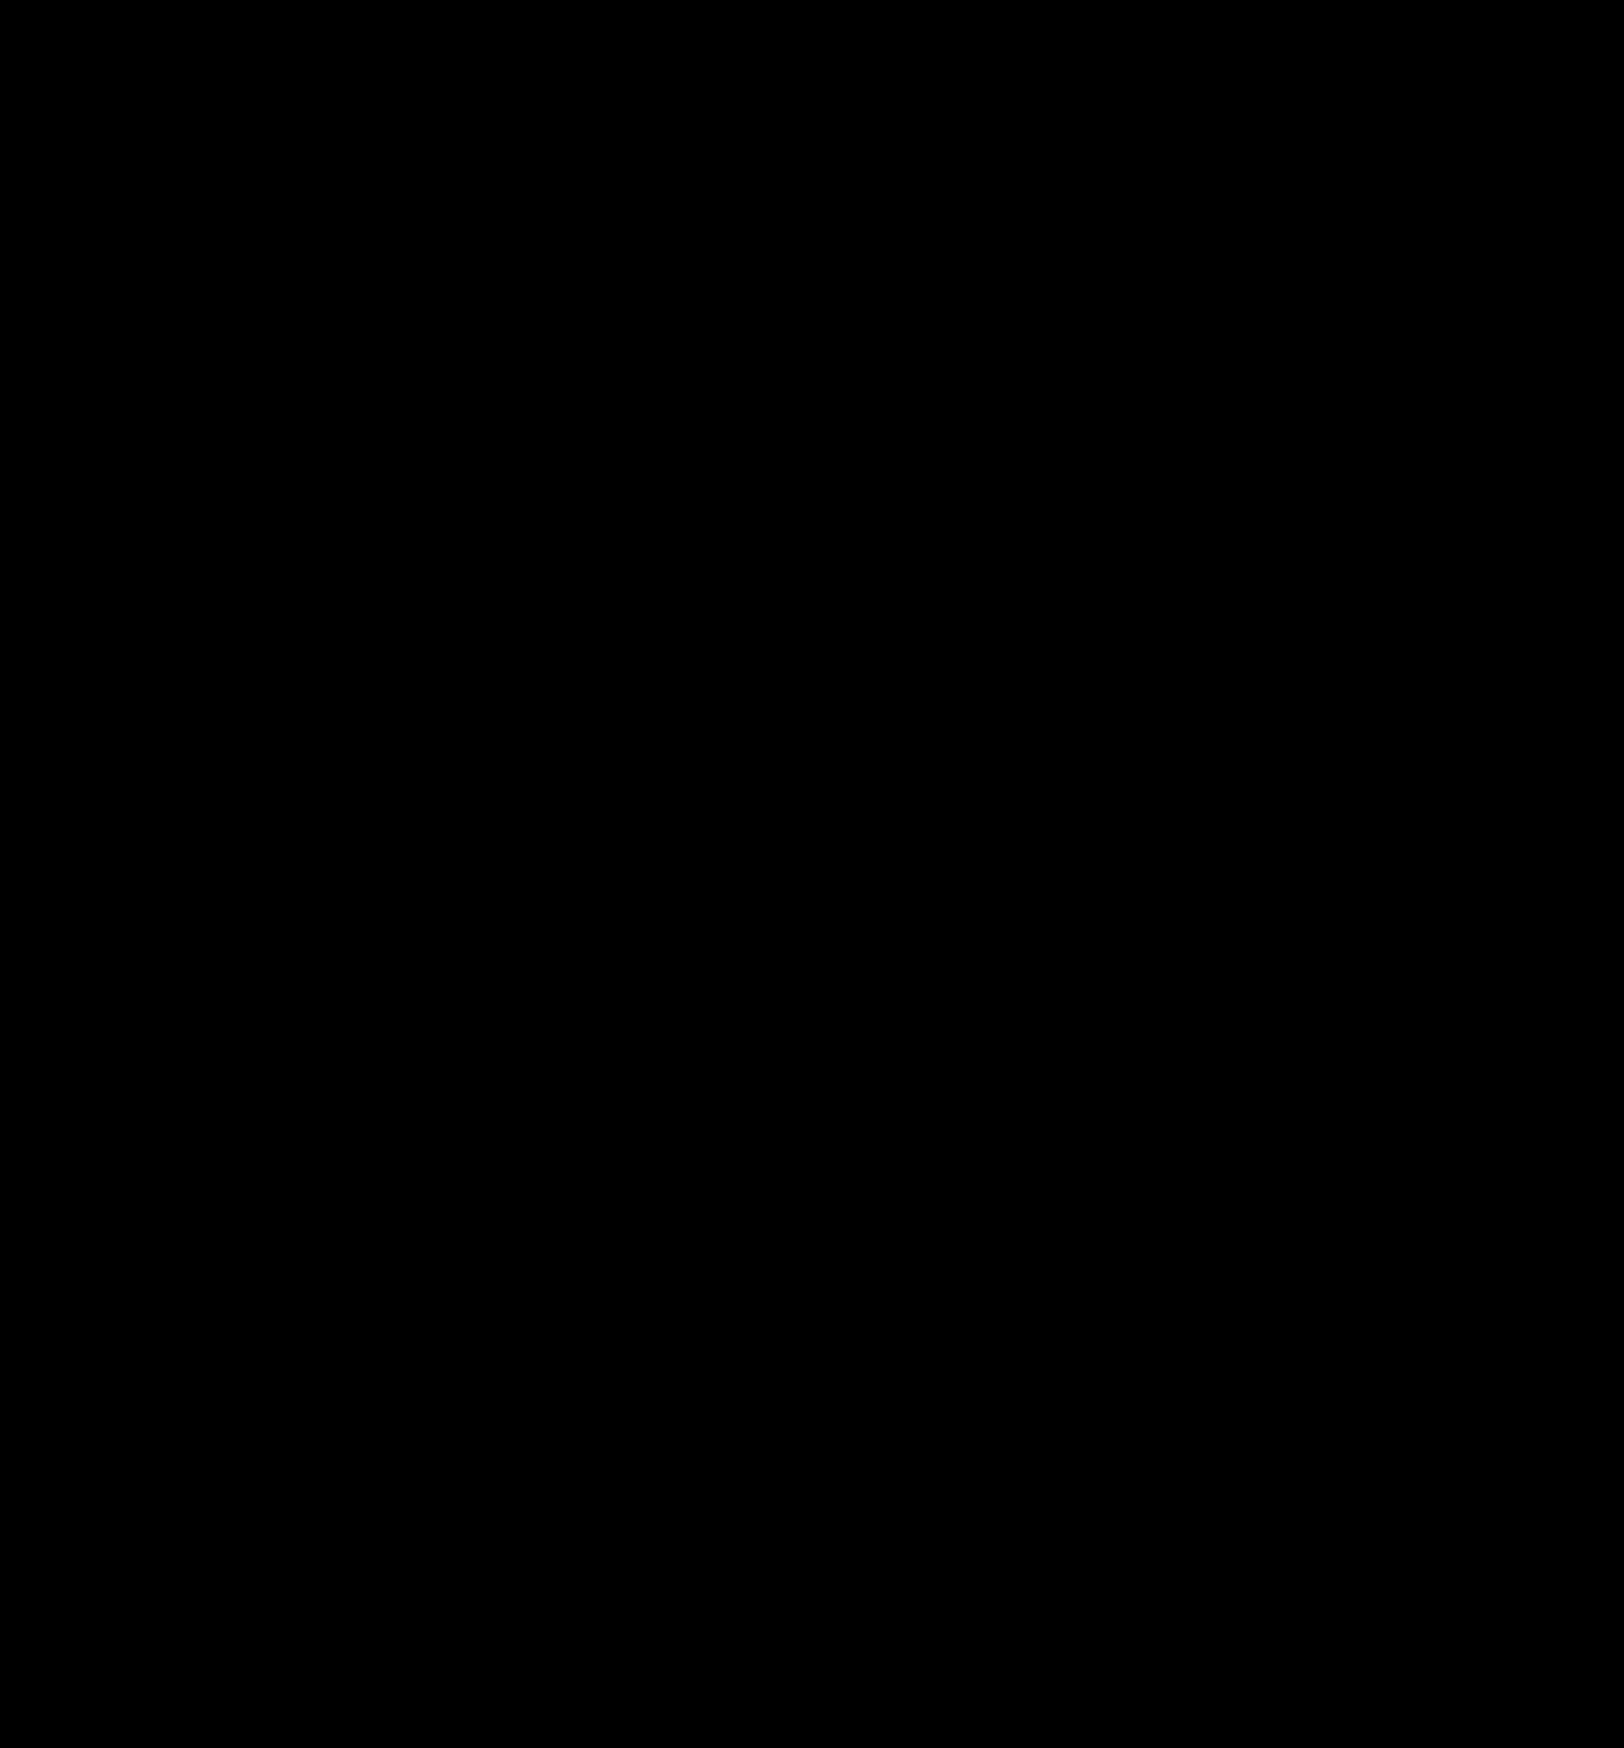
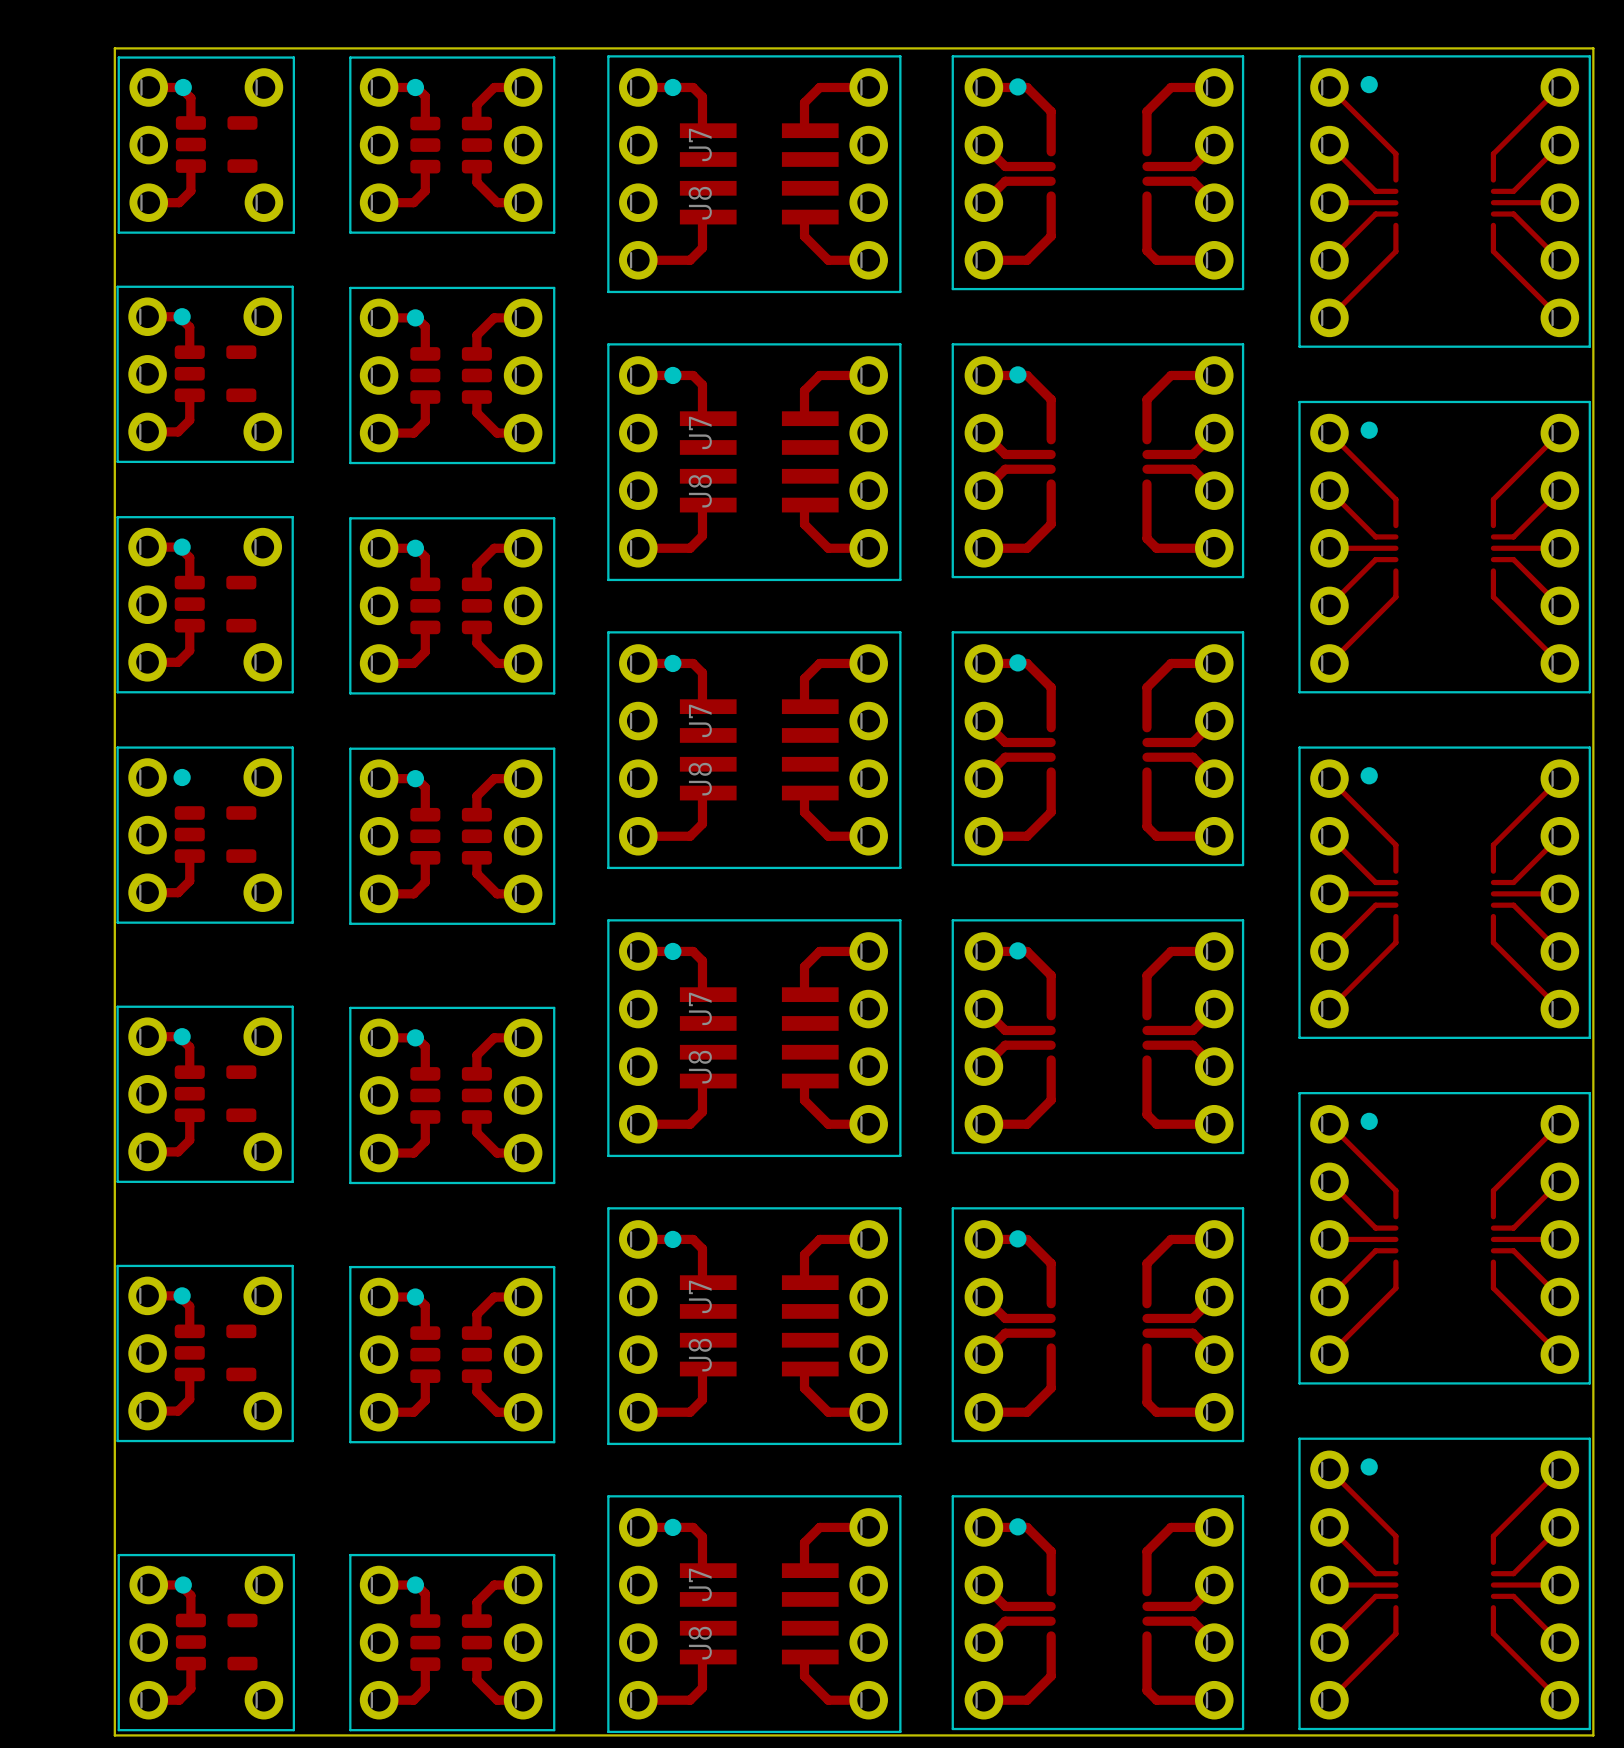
board edge: none -> (114, 48) (1593, 48) (1593, 1735) (114, 1735) (114, 48)
line: none -> (608, 56) (608, 291) (900, 291) (900, 56) (608, 56)
line: none -> (952, 56) (1243, 56) (1243, 289) (952, 289) (952, 56)
line: none -> (1299, 56) (1589, 56) (1589, 346) (1299, 346) (1299, 56)
line: none -> (118, 57) (118, 232) (293, 232) (293, 57) (118, 57)
line: none -> (350, 57) (350, 232) (554, 232) (554, 57) (350, 57)
drawing: none -> [1360, 76, 1378, 94]
drawing: none -> [174, 78, 192, 97]
drawing: none -> [406, 78, 425, 97]
drawing: none -> [664, 78, 682, 97]
drawing: none -> [1009, 78, 1027, 96]
top track: none -> (148, 87) (180, 87) (190, 97) (190, 122)
part: none -> (148, 87)
part: none -> (263, 87)
top track: none -> (379, 87) (416, 87) (425, 96) (425, 123)
part: none -> (379, 87)
top track: none -> (523, 87) (494, 87) (476, 104) (476, 123)
part: none -> (523, 87)
top track: none -> (638, 87) (693, 87) (702, 96) (702, 130)
part: none -> (638, 87)
top track: none -> (868, 87) (819, 87) (804, 102) (804, 130)
part: none -> (868, 87)
top track: none -> (983, 87) (1027, 87) (1051, 111) (1051, 151)
part: none -> (983, 87)
top track: none -> (1214, 87) (1171, 87) (1146, 111) (1146, 151)
part: none -> (1214, 87)
top track: none -> (1329, 87) (1395, 153) (1395, 180)
part: none -> (1329, 87)
top track: none -> (1559, 87) (1493, 153) (1493, 180)
part: none -> (1559, 87)
part: none -> (216, 144)
part: none -> (148, 145)
part: none -> (379, 145)
part: none -> (451, 145)
part: none -> (523, 145)
J7: none -> (638, 145)
part: none -> (868, 145)
top track: none -> (983, 145) (1005, 166) (1051, 166)
part: none -> (983, 145)
top track: none -> (1214, 145) (1192, 166) (1146, 166)
part: none -> (1214, 145)
top track: none -> (1329, 145) (1375, 191) (1395, 191)
part: none -> (1329, 145)
top track: none -> (1559, 145) (1513, 191) (1493, 191)
part: none -> (1559, 145)
top track: none -> (190, 166) (190, 191) (179, 202) (148, 202)
top track: none -> (425, 166) (425, 191) (413, 202) (379, 202)
top track: none -> (476, 166) (476, 182) (497, 202) (523, 202)
part: none -> (759, 173)
top track: none -> (1051, 181) (1005, 181) (983, 202)
top track: none -> (1146, 181) (1192, 181) (1214, 202)
top track: none -> (1051, 196) (1051, 236) (1027, 260) (983, 260)
top track: none -> (1146, 196) (1146, 250) (1156, 260) (1214, 260)
part: none -> (148, 202)
part: none -> (263, 202)
part: none -> (379, 202)
part: none -> (523, 202)
J8: none -> (638, 202)
part: none -> (868, 202)
part: none -> (983, 202)
part: none -> (1214, 202)
top track: none -> (1329, 202) (1395, 202)
part: none -> (1329, 202)
top track: none -> (1493, 202) (1559, 202)
part: none -> (1559, 202)
top track: none -> (1395, 214) (1375, 214) (1329, 260)
top track: none -> (1493, 214) (1513, 214) (1559, 260)
top track: none -> (702, 217) (702, 247) (690, 260) (638, 260)
top track: none -> (804, 217) (804, 236) (828, 260) (868, 260)
top track: none -> (1395, 225) (1395, 251) (1329, 317)
top track: none -> (1493, 225) (1493, 251) (1559, 317)
part: none -> (638, 260)
part: none -> (868, 260)
part: none -> (983, 260)
part: none -> (1214, 260)
part: none -> (1329, 260)
part: none -> (1559, 260)
line: none -> (117, 286) (117, 461) (292, 461) (292, 286) (117, 286)
line: none -> (350, 287) (350, 463) (554, 463) (554, 287) (350, 287)
drawing: none -> [173, 308, 191, 326]
drawing: none -> [406, 309, 425, 327]
top track: none -> (147, 316) (179, 316) (189, 327) (189, 352)
part: none -> (147, 316)
part: none -> (262, 316)
top track: none -> (379, 317) (416, 317) (425, 326) (425, 353)
part: none -> (379, 317)
top track: none -> (523, 317) (494, 317) (476, 335) (476, 353)
part: none -> (523, 317)
part: none -> (1329, 317)
part: none -> (1559, 317)
line: none -> (608, 344) (900, 344) (900, 579) (608, 579) (608, 344)
line: none -> (952, 344) (1243, 344) (1243, 577) (952, 577) (952, 344)
drawing: none -> [664, 366, 682, 385]
drawing: none -> [1009, 366, 1027, 384]
part: none -> (215, 373)
part: none -> (147, 374)
part: none -> (379, 375)
part: none -> (451, 375)
part: none -> (523, 375)
top track: none -> (638, 375) (693, 375) (702, 384) (702, 418)
part: none -> (638, 375)
top track: none -> (868, 375) (819, 375) (804, 390) (804, 418)
part: none -> (868, 375)
top track: none -> (983, 375) (1027, 375) (1051, 399) (1051, 439)
part: none -> (983, 375)
top track: none -> (1214, 375) (1171, 375) (1146, 399) (1146, 439)
part: none -> (1214, 375)
top track: none -> (189, 395) (189, 420) (178, 431) (147, 431)
top track: none -> (425, 397) (425, 421) (413, 433) (379, 433)
top track: none -> (476, 397) (476, 412) (497, 433) (523, 433)
line: none -> (1299, 401) (1299, 692) (1589, 692) (1589, 401) (1299, 401)
drawing: none -> [1360, 421, 1378, 439]
part: none -> (147, 431)
part: none -> (262, 431)
part: none -> (379, 433)
part: none -> (523, 433)
J7: none -> (638, 433)
part: none -> (868, 433)
top track: none -> (983, 433) (1005, 454) (1051, 454)
part: none -> (983, 433)
top track: none -> (1214, 433) (1192, 454) (1146, 454)
part: none -> (1214, 433)
top track: none -> (1329, 433) (1395, 499) (1395, 525)
part: none -> (1329, 433)
top track: none -> (1559, 433) (1493, 499) (1493, 525)
part: none -> (1559, 433)
part: none -> (759, 461)
top track: none -> (1051, 469) (1005, 469) (983, 490)
top track: none -> (1146, 469) (1192, 469) (1214, 490)
top track: none -> (1051, 483) (1051, 524) (1027, 548) (983, 548)
top track: none -> (1146, 483) (1146, 538) (1156, 548) (1214, 548)
J8: none -> (638, 490)
part: none -> (868, 490)
part: none -> (983, 490)
part: none -> (1214, 490)
top track: none -> (1329, 490) (1375, 536) (1395, 536)
part: none -> (1329, 490)
top track: none -> (1559, 490) (1513, 536) (1493, 536)
part: none -> (1559, 490)
top track: none -> (702, 505) (702, 535) (690, 548) (638, 548)
top track: none -> (804, 505) (804, 524) (828, 548) (868, 548)
line: none -> (117, 517) (117, 692) (292, 692) (292, 517) (117, 517)
line: none -> (350, 518) (350, 693) (554, 693) (554, 518) (350, 518)
drawing: none -> [173, 538, 191, 556]
drawing: none -> [406, 539, 425, 557]
top track: none -> (147, 547) (179, 547) (189, 557) (189, 582)
part: none -> (147, 547)
part: none -> (262, 547)
top track: none -> (379, 548) (416, 548) (425, 557) (425, 584)
part: none -> (379, 548)
top track: none -> (523, 548) (494, 548) (476, 565) (476, 584)
part: none -> (523, 548)
part: none -> (638, 548)
part: none -> (868, 548)
part: none -> (983, 548)
part: none -> (1214, 548)
top track: none -> (1329, 548) (1395, 548)
part: none -> (1329, 548)
top track: none -> (1493, 548) (1559, 548)
part: none -> (1559, 548)
top track: none -> (1395, 559) (1375, 559) (1329, 605)
top track: none -> (1493, 559) (1513, 559) (1559, 605)
top track: none -> (1395, 570) (1395, 597) (1329, 663)
top track: none -> (1493, 570) (1493, 597) (1559, 663)
part: none -> (147, 604)
part: none -> (215, 604)
part: none -> (379, 605)
part: none -> (451, 605)
part: none -> (523, 605)
part: none -> (1329, 605)
part: none -> (1559, 605)
top track: none -> (189, 625) (189, 650) (178, 662) (147, 662)
top track: none -> (425, 627) (425, 651) (413, 663) (379, 663)
top track: none -> (476, 627) (476, 643) (497, 663) (523, 663)
line: none -> (608, 632) (608, 867) (900, 867) (900, 632) (608, 632)
line: none -> (952, 632) (952, 865) (1243, 865) (1243, 632) (952, 632)
drawing: none -> [664, 654, 682, 673]
drawing: none -> [1009, 654, 1027, 672]
part: none -> (147, 662)
part: none -> (262, 662)
part: none -> (379, 663)
part: none -> (523, 663)
top track: none -> (638, 663) (693, 663) (702, 672) (702, 706)
part: none -> (638, 663)
top track: none -> (868, 663) (819, 663) (804, 678) (804, 706)
part: none -> (868, 663)
top track: none -> (983, 663) (1027, 663) (1051, 687) (1051, 727)
part: none -> (983, 663)
top track: none -> (1214, 663) (1171, 663) (1146, 687) (1146, 727)
part: none -> (1214, 663)
part: none -> (1329, 663)
part: none -> (1559, 663)
J7: none -> (638, 721)
part: none -> (868, 721)
top track: none -> (983, 721) (1005, 742) (1051, 742)
part: none -> (983, 721)
top track: none -> (1214, 721) (1192, 742) (1146, 742)
part: none -> (1214, 721)
line: none -> (117, 747) (292, 747) (292, 922) (117, 922) (117, 747)
line: none -> (1299, 747) (1589, 747) (1589, 1037) (1299, 1037) (1299, 747)
line: none -> (350, 748) (554, 748) (554, 923) (350, 923) (350, 748)
part: none -> (759, 749)
top track: none -> (1051, 757) (1005, 757) (983, 778)
top track: none -> (1146, 757) (1192, 757) (1214, 778)
drawing: none -> [1360, 767, 1378, 785]
drawing: none -> [173, 768, 191, 787]
drawing: none -> [406, 770, 425, 788]
top track: none -> (1051, 771) (1051, 812) (1027, 836) (983, 836)
top track: none -> (1146, 771) (1146, 826) (1156, 836) (1214, 836)
part: none -> (147, 777)
part: none -> (262, 777)
top track: none -> (379, 778) (416, 778) (425, 787) (425, 814)
part: none -> (379, 778)
top track: none -> (523, 778) (494, 778) (476, 796) (476, 814)
part: none -> (523, 778)
J8: none -> (638, 778)
part: none -> (868, 778)
part: none -> (983, 778)
part: none -> (1214, 778)
top track: none -> (1329, 778) (1395, 845) (1395, 871)
part: none -> (1329, 778)
top track: none -> (1559, 778) (1493, 845) (1493, 871)
part: none -> (1559, 778)
top track: none -> (702, 793) (702, 823) (690, 836) (638, 836)
top track: none -> (804, 793) (804, 812) (828, 836) (868, 836)
part: none -> (215, 834)
part: none -> (147, 835)
part: none -> (379, 836)
part: none -> (451, 836)
part: none -> (523, 836)
part: none -> (638, 836)
part: none -> (868, 836)
part: none -> (983, 836)
part: none -> (1214, 836)
top track: none -> (1329, 836) (1375, 882) (1395, 882)
part: none -> (1329, 836)
top track: none -> (1559, 836) (1513, 882) (1493, 882)
part: none -> (1559, 836)
top track: none -> (189, 856) (189, 881) (178, 892) (147, 892)
top track: none -> (425, 857) (425, 882) (413, 893) (379, 893)
top track: none -> (476, 857) (476, 873) (497, 893) (523, 893)
part: none -> (147, 892)
part: none -> (262, 892)
part: none -> (379, 893)
part: none -> (523, 893)
top track: none -> (1329, 893) (1395, 893)
part: none -> (1329, 893)
top track: none -> (1493, 893) (1559, 893)
part: none -> (1559, 893)
top track: none -> (1395, 905) (1375, 905) (1329, 951)
top track: none -> (1493, 905) (1513, 905) (1559, 951)
top track: none -> (1395, 916) (1395, 942) (1329, 1009)
top track: none -> (1493, 916) (1493, 942) (1559, 1009)
line: none -> (608, 920) (608, 1155) (900, 1155) (900, 920) (608, 920)
line: none -> (952, 920) (952, 1153) (1243, 1153) (1243, 920) (952, 920)
drawing: none -> [664, 942, 682, 961]
drawing: none -> [1009, 942, 1027, 960]
top track: none -> (638, 951) (693, 951) (702, 960) (702, 994)
part: none -> (638, 951)
top track: none -> (868, 951) (819, 951) (804, 966) (804, 994)
part: none -> (868, 951)
top track: none -> (983, 951) (1027, 951) (1051, 975) (1051, 1015)
part: none -> (983, 951)
top track: none -> (1214, 951) (1171, 951) (1146, 975) (1146, 1015)
part: none -> (1214, 951)
part: none -> (1329, 951)
part: none -> (1559, 951)
line: none -> (117, 1006) (117, 1181) (292, 1181) (292, 1006) (117, 1006)
line: none -> (350, 1007) (350, 1182) (554, 1182) (554, 1007) (350, 1007)
J7: none -> (638, 1009)
part: none -> (868, 1009)
top track: none -> (983, 1009) (1005, 1030) (1051, 1030)
part: none -> (983, 1009)
top track: none -> (1214, 1009) (1192, 1030) (1146, 1030)
part: none -> (1214, 1009)
part: none -> (1329, 1009)
part: none -> (1559, 1009)
drawing: none -> [173, 1028, 191, 1046]
drawing: none -> [406, 1029, 425, 1047]
top track: none -> (147, 1036) (179, 1036) (189, 1047) (189, 1072)
part: none -> (147, 1036)
part: none -> (262, 1036)
top track: none -> (379, 1037) (416, 1037) (425, 1046) (425, 1073)
part: none -> (379, 1037)
top track: none -> (523, 1037) (494, 1037) (476, 1055) (476, 1073)
part: none -> (523, 1037)
part: none -> (759, 1037)
top track: none -> (1051, 1045) (1005, 1045) (983, 1066)
top track: none -> (1146, 1045) (1192, 1045) (1214, 1066)
top track: none -> (1051, 1059) (1051, 1100) (1027, 1124) (983, 1124)
top track: none -> (1146, 1059) (1146, 1114) (1156, 1124) (1214, 1124)
J8: none -> (638, 1066)
part: none -> (868, 1066)
part: none -> (983, 1066)
part: none -> (1214, 1066)
top track: none -> (702, 1081) (702, 1111) (690, 1124) (638, 1124)
top track: none -> (804, 1081) (804, 1100) (828, 1124) (868, 1124)
part: none -> (215, 1093)
line: none -> (1299, 1093) (1299, 1383) (1589, 1383) (1589, 1093) (1299, 1093)
part: none -> (147, 1094)
part: none -> (379, 1095)
part: none -> (451, 1095)
part: none -> (523, 1095)
drawing: none -> [1360, 1112, 1378, 1130]
top track: none -> (189, 1115) (189, 1140) (178, 1151) (147, 1151)
top track: none -> (425, 1116) (425, 1141) (413, 1153) (379, 1153)
top track: none -> (476, 1116) (476, 1132) (497, 1153) (523, 1153)
part: none -> (638, 1124)
part: none -> (868, 1124)
part: none -> (983, 1124)
part: none -> (1214, 1124)
top track: none -> (1329, 1124) (1395, 1190) (1395, 1216)
part: none -> (1329, 1124)
top track: none -> (1559, 1124) (1493, 1190) (1493, 1216)
part: none -> (1559, 1124)
part: none -> (147, 1151)
part: none -> (262, 1151)
part: none -> (379, 1153)
part: none -> (523, 1153)
top track: none -> (1329, 1181) (1375, 1228) (1395, 1228)
part: none -> (1329, 1181)
top track: none -> (1559, 1181) (1513, 1228) (1493, 1228)
part: none -> (1559, 1181)
line: none -> (608, 1208) (608, 1443) (900, 1443) (900, 1208) (608, 1208)
line: none -> (952, 1208) (952, 1441) (1243, 1441) (1243, 1208) (952, 1208)
drawing: none -> [664, 1230, 682, 1249]
drawing: none -> [1009, 1230, 1027, 1248]
top track: none -> (638, 1239) (693, 1239) (702, 1248) (702, 1282)
part: none -> (638, 1239)
top track: none -> (868, 1239) (819, 1239) (804, 1254) (804, 1282)
part: none -> (868, 1239)
top track: none -> (983, 1239) (1027, 1239) (1051, 1263) (1051, 1303)
part: none -> (983, 1239)
top track: none -> (1214, 1239) (1171, 1239) (1146, 1263) (1146, 1303)
part: none -> (1214, 1239)
top track: none -> (1329, 1239) (1395, 1239)
part: none -> (1329, 1239)
top track: none -> (1493, 1239) (1559, 1239)
part: none -> (1559, 1239)
top track: none -> (1395, 1250) (1375, 1250) (1329, 1297)
top track: none -> (1493, 1250) (1513, 1250) (1559, 1297)
top track: none -> (1395, 1262) (1395, 1288) (1329, 1354)
top track: none -> (1493, 1262) (1493, 1288) (1559, 1354)
line: none -> (117, 1265) (117, 1441) (292, 1441) (292, 1265) (117, 1265)
line: none -> (350, 1267) (350, 1442) (554, 1442) (554, 1267) (350, 1267)
drawing: none -> [173, 1287, 191, 1305]
drawing: none -> [406, 1288, 425, 1306]
top track: none -> (147, 1295) (179, 1295) (189, 1306) (189, 1331)
part: none -> (147, 1295)
part: none -> (262, 1295)
top track: none -> (379, 1297) (416, 1297) (425, 1305) (425, 1333)
part: none -> (379, 1297)
top track: none -> (523, 1297) (494, 1297) (476, 1314) (476, 1333)
part: none -> (523, 1297)
J7: none -> (638, 1297)
part: none -> (868, 1297)
top track: none -> (983, 1297) (1005, 1318) (1051, 1318)
part: none -> (983, 1297)
top track: none -> (1214, 1297) (1192, 1318) (1146, 1318)
part: none -> (1214, 1297)
part: none -> (1329, 1297)
part: none -> (1559, 1297)
part: none -> (759, 1325)
top track: none -> (1051, 1333) (1005, 1333) (983, 1354)
top track: none -> (1146, 1333) (1192, 1333) (1214, 1354)
top track: none -> (1051, 1347) (1051, 1388) (1027, 1412) (983, 1412)
top track: none -> (1146, 1347) (1146, 1402) (1156, 1412) (1214, 1412)
part: none -> (215, 1352)
part: none -> (147, 1353)
part: none -> (379, 1354)
part: none -> (451, 1354)
part: none -> (523, 1354)
J8: none -> (638, 1354)
part: none -> (868, 1354)
part: none -> (983, 1354)
part: none -> (1214, 1354)
part: none -> (1329, 1354)
part: none -> (1559, 1354)
top track: none -> (702, 1369) (702, 1399) (690, 1412) (638, 1412)
top track: none -> (804, 1369) (804, 1388) (828, 1412) (868, 1412)
top track: none -> (189, 1374) (189, 1399) (178, 1411) (147, 1411)
top track: none -> (425, 1376) (425, 1400) (413, 1412) (379, 1412)
top track: none -> (476, 1376) (476, 1391) (497, 1412) (523, 1412)
part: none -> (147, 1411)
part: none -> (262, 1411)
part: none -> (379, 1412)
part: none -> (523, 1412)
part: none -> (638, 1412)
part: none -> (868, 1412)
part: none -> (983, 1412)
part: none -> (1214, 1412)
line: none -> (1299, 1438) (1299, 1729) (1589, 1729) (1589, 1438) (1299, 1438)
drawing: none -> [1360, 1458, 1378, 1476]
top track: none -> (1329, 1469) (1395, 1536) (1395, 1562)
part: none -> (1329, 1469)
top track: none -> (1559, 1469) (1493, 1536) (1493, 1562)
part: none -> (1559, 1469)
line: none -> (608, 1496) (608, 1731) (900, 1731) (900, 1496) (608, 1496)
line: none -> (952, 1496) (1243, 1496) (1243, 1729) (952, 1729) (952, 1496)
drawing: none -> [664, 1518, 682, 1537]
drawing: none -> [1009, 1518, 1027, 1536]
top track: none -> (638, 1527) (693, 1527) (702, 1536) (702, 1570)
part: none -> (638, 1527)
top track: none -> (868, 1527) (819, 1527) (804, 1542) (804, 1570)
part: none -> (868, 1527)
top track: none -> (983, 1527) (1027, 1527) (1051, 1551) (1051, 1591)
part: none -> (983, 1527)
top track: none -> (1214, 1527) (1171, 1527) (1146, 1551) (1146, 1591)
part: none -> (1214, 1527)
top track: none -> (1329, 1527) (1375, 1573) (1395, 1573)
part: none -> (1329, 1527)
top track: none -> (1559, 1527) (1513, 1573) (1493, 1573)
part: none -> (1559, 1527)
line: none -> (118, 1555) (293, 1555) (293, 1730) (118, 1730) (118, 1555)
line: none -> (350, 1555) (350, 1730) (554, 1730) (554, 1555) (350, 1555)
drawing: none -> [174, 1576, 192, 1594]
drawing: none -> [406, 1576, 425, 1594]
top track: none -> (148, 1585) (180, 1585) (190, 1595) (190, 1620)
part: none -> (148, 1585)
part: none -> (263, 1585)
top track: none -> (379, 1585) (416, 1585) (425, 1593) (425, 1621)
part: none -> (379, 1585)
top track: none -> (523, 1585) (494, 1585) (476, 1602) (476, 1621)
part: none -> (523, 1585)
J7: none -> (638, 1585)
part: none -> (868, 1585)
top track: none -> (983, 1585) (1005, 1606) (1051, 1606)
part: none -> (983, 1585)
top track: none -> (1214, 1585) (1192, 1606) (1146, 1606)
part: none -> (1214, 1585)
top track: none -> (1329, 1585) (1395, 1585)
part: none -> (1329, 1585)
top track: none -> (1493, 1585) (1559, 1585)
part: none -> (1559, 1585)
top track: none -> (1395, 1596) (1375, 1596) (1329, 1642)
top track: none -> (1493, 1596) (1513, 1596) (1559, 1642)
top track: none -> (1395, 1607) (1395, 1633) (1329, 1700)
top track: none -> (1493, 1607) (1493, 1633) (1559, 1700)
part: none -> (759, 1613)
top track: none -> (1051, 1621) (1005, 1621) (983, 1642)
top track: none -> (1146, 1621) (1192, 1621) (1214, 1642)
top track: none -> (1051, 1635) (1051, 1676) (1027, 1700) (983, 1700)
top track: none -> (1146, 1635) (1146, 1690) (1156, 1700) (1214, 1700)
part: none -> (148, 1642)
part: none -> (216, 1642)
part: none -> (379, 1642)
part: none -> (451, 1642)
part: none -> (523, 1642)
J8: none -> (638, 1642)
part: none -> (868, 1642)
part: none -> (983, 1642)
part: none -> (1214, 1642)
part: none -> (1329, 1642)
part: none -> (1559, 1642)
top track: none -> (702, 1657) (702, 1687) (690, 1700) (638, 1700)
top track: none -> (804, 1657) (804, 1676) (828, 1700) (868, 1700)
top track: none -> (190, 1663) (190, 1688) (179, 1700) (148, 1700)
top track: none -> (425, 1664) (425, 1688) (413, 1700) (379, 1700)
top track: none -> (476, 1664) (476, 1679) (497, 1700) (523, 1700)
part: none -> (148, 1700)
part: none -> (263, 1700)
part: none -> (379, 1700)
part: none -> (523, 1700)
part: none -> (638, 1700)
part: none -> (868, 1700)
part: none -> (983, 1700)
part: none -> (1214, 1700)
part: none -> (1329, 1700)
part: none -> (1559, 1700)

